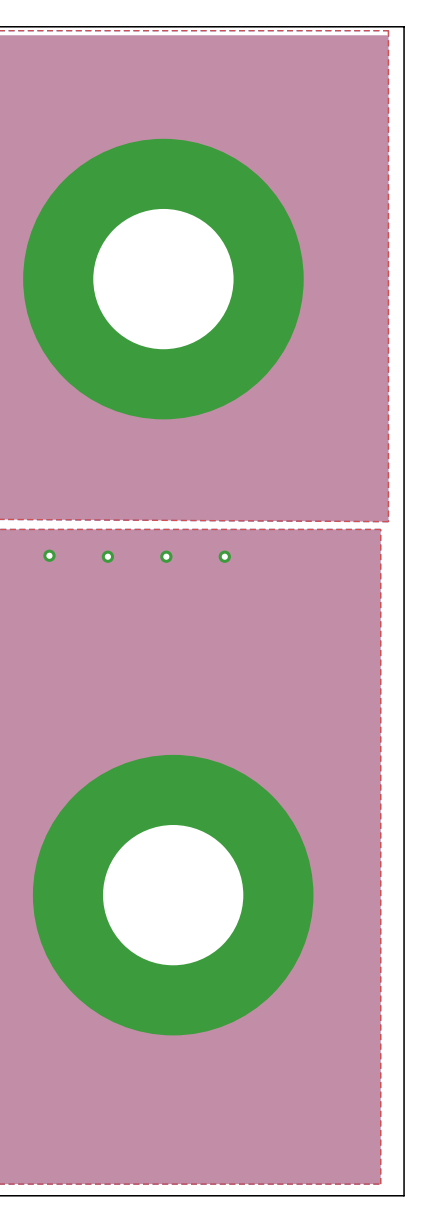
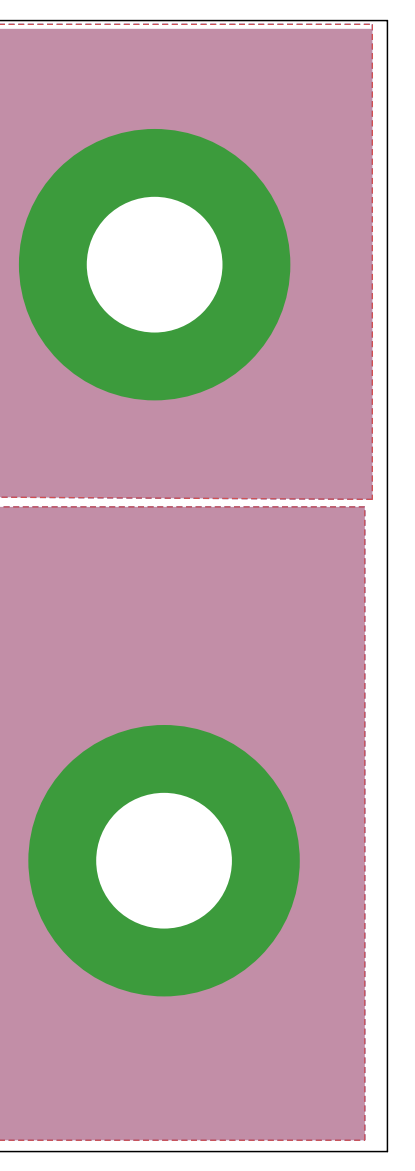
via: (49, 555) -> none
via: (107, 556) -> none
via: (166, 556) -> none
via: (224, 556) -> none

